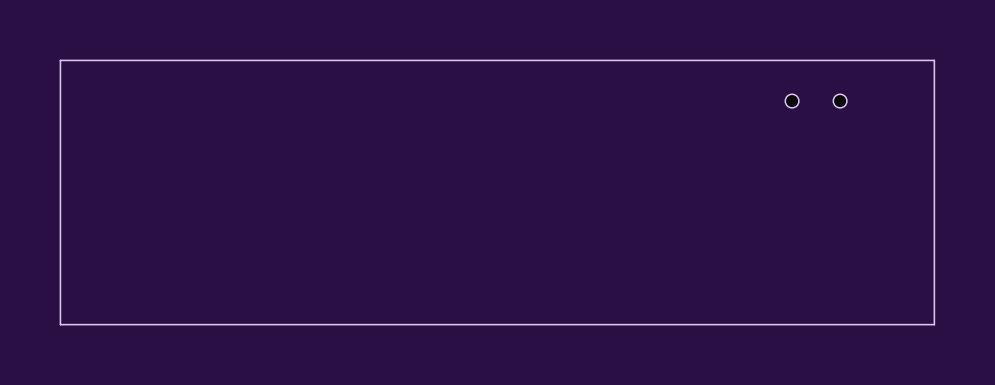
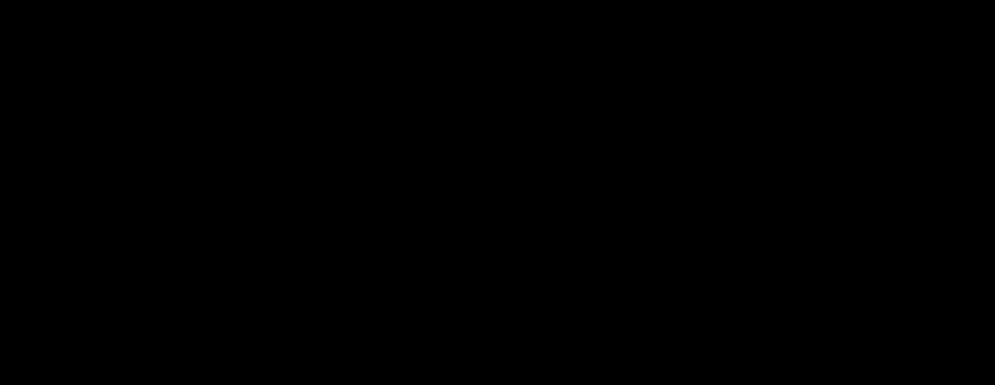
board edge: (934, 60) (60, 60) (60, 324) (934, 324) (934, 60) -> none
part: (816, 101) -> none

